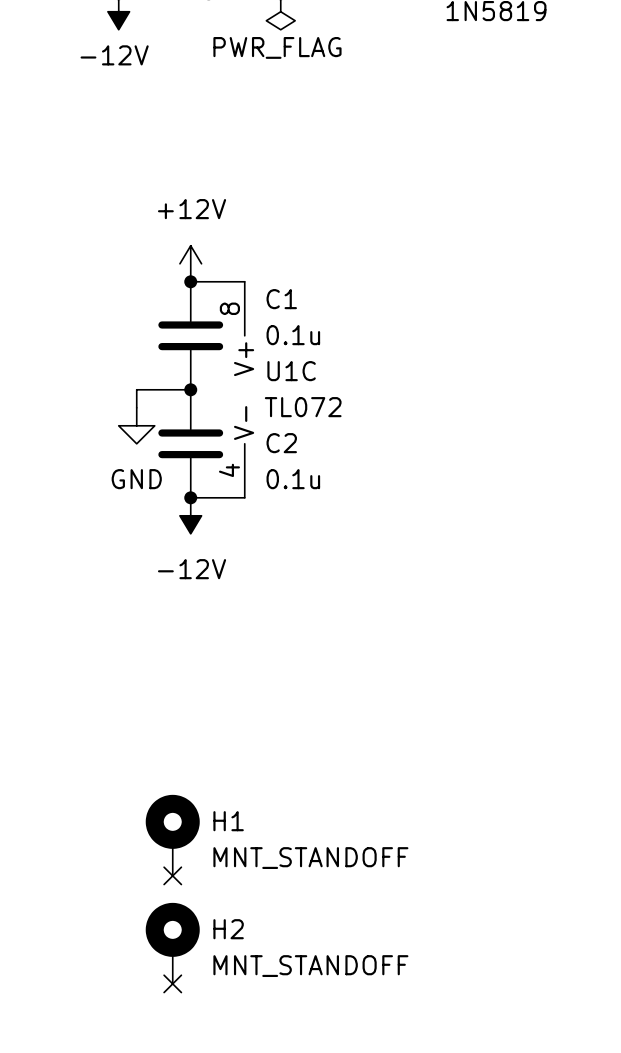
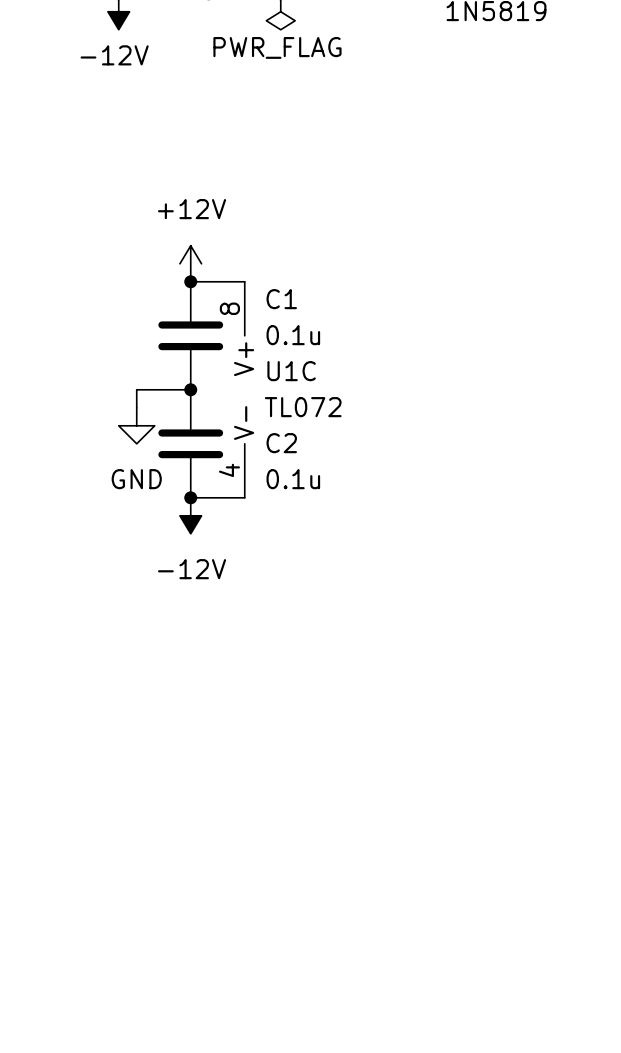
H1: MNT_STANDOFF (172, 835) -> none
no-connect mark: (172, 875) -> none
H2: MNT_STANDOFF (172, 943) -> none
no-connect mark: (172, 983) -> none

